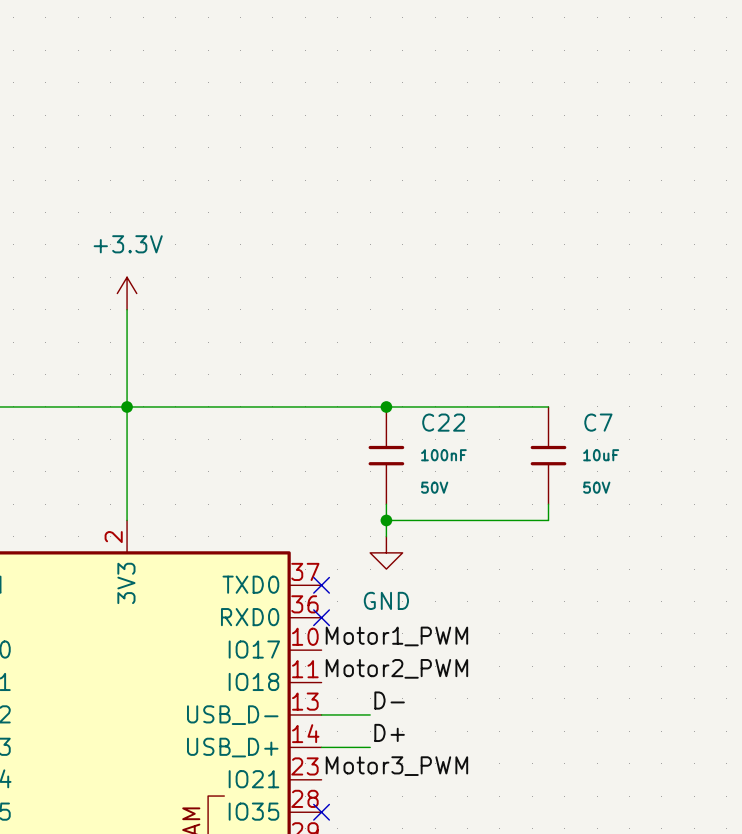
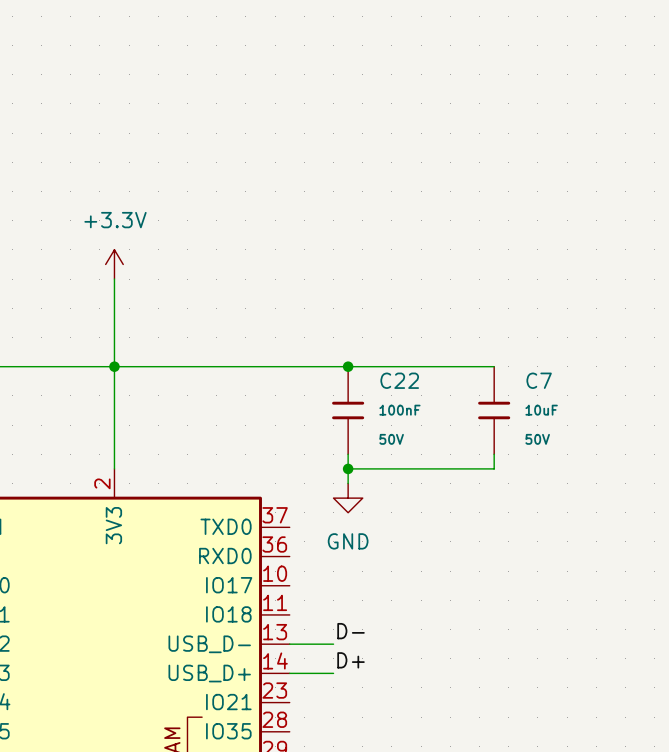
no-connect mark: (321, 585) -> none
no-connect mark: (321, 617) -> none
label: Motor1_PWM (396, 636) -> none
label: Motor2_PWM (396, 668) -> none
label: Motor3_PWM (396, 766) -> none
no-connect mark: (321, 812) -> none

